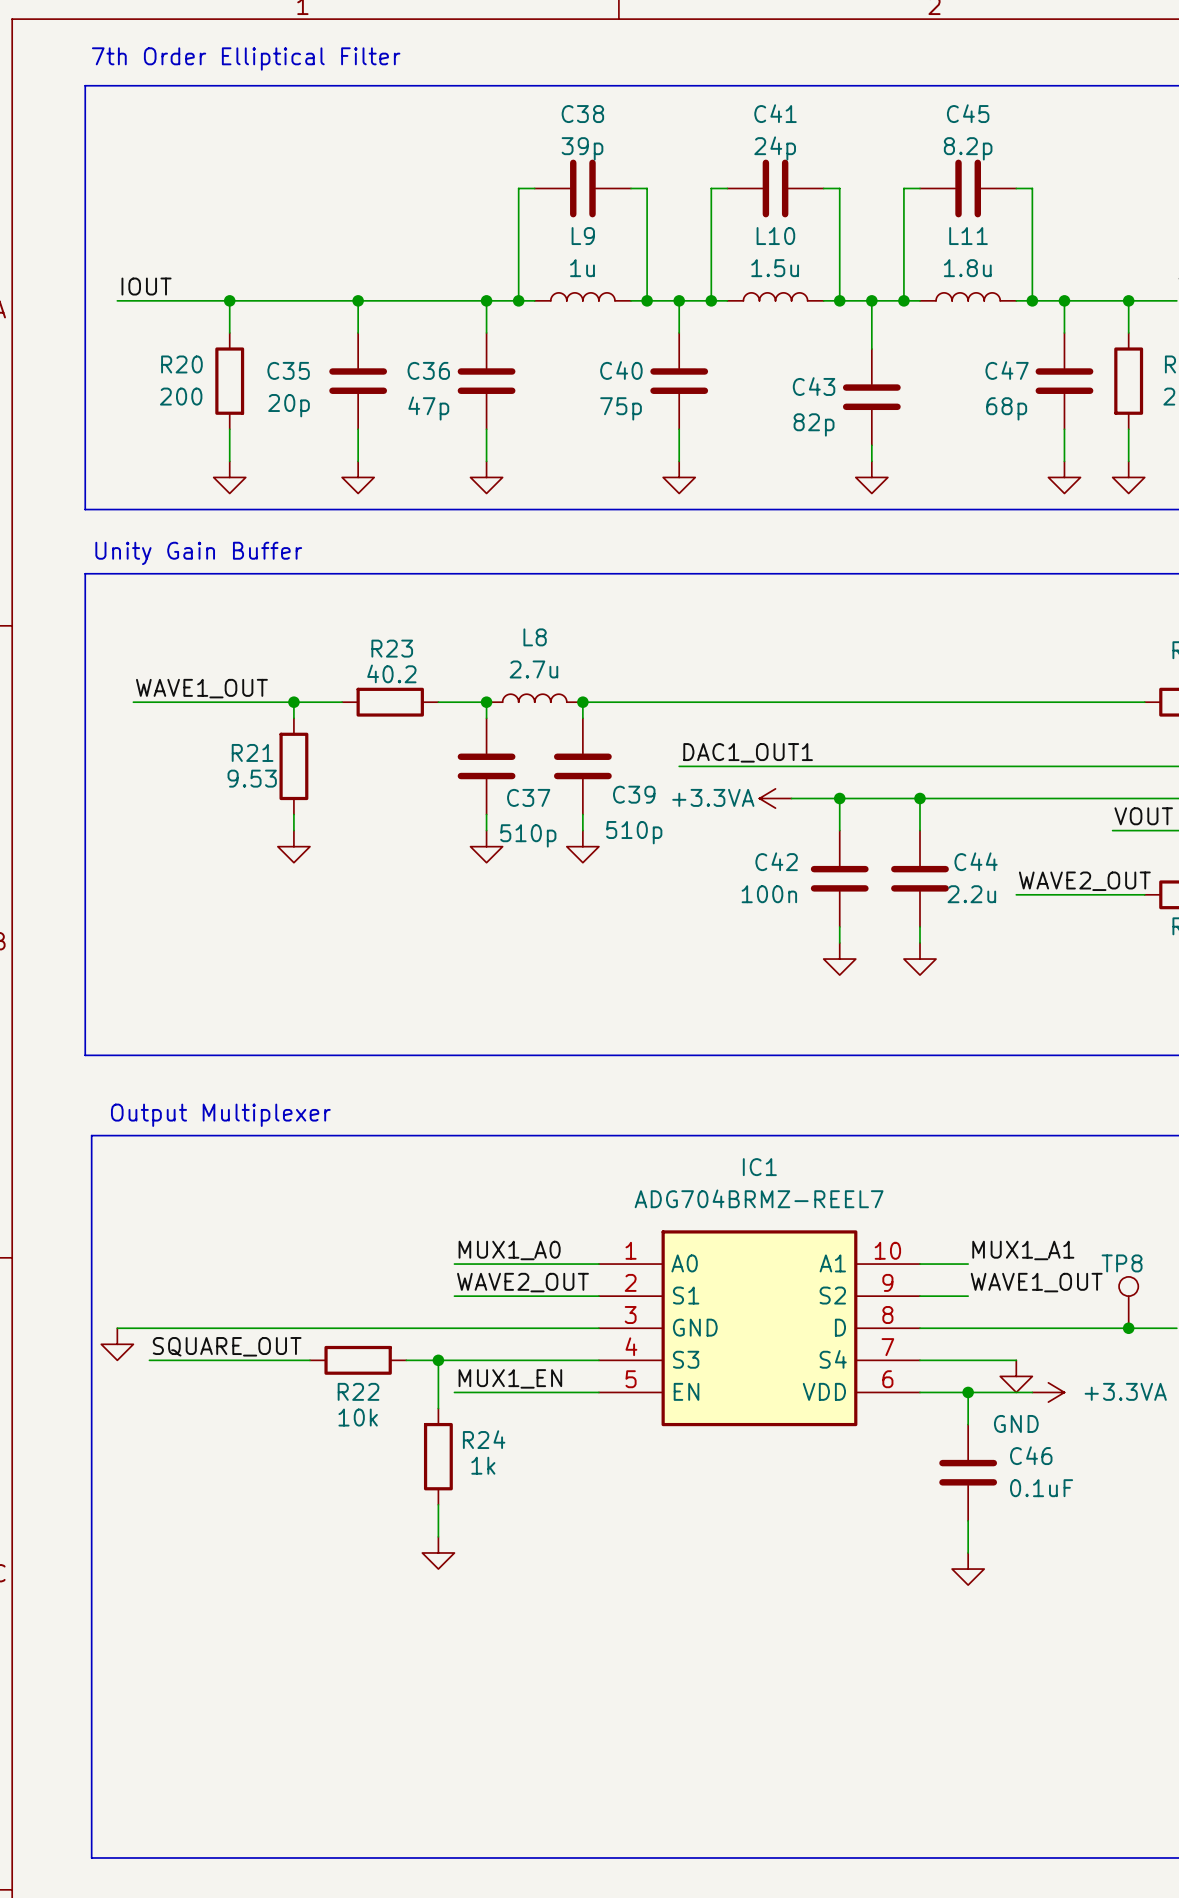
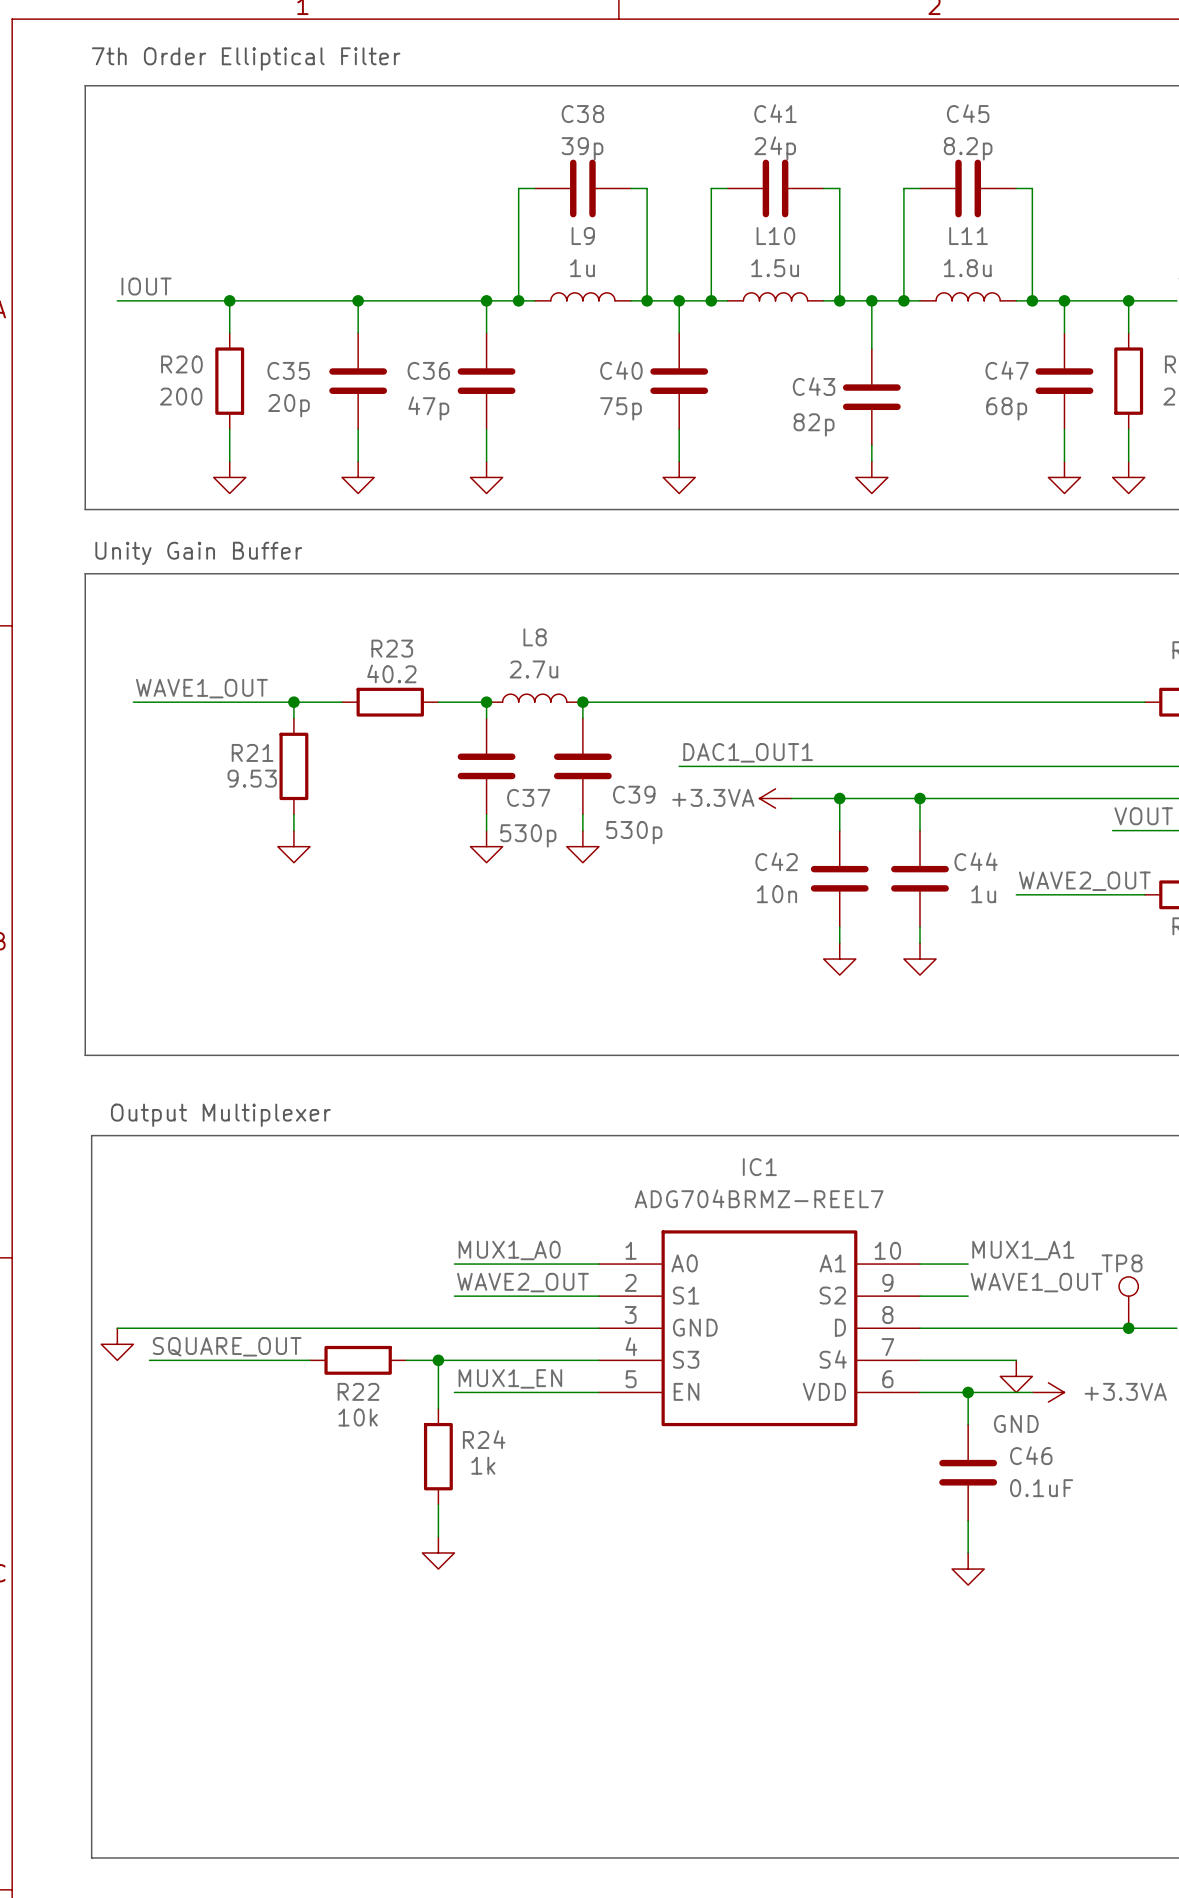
C39 value: 510p (634, 832) -> 530p (634, 832)
C37 value: 510p (528, 835) -> 530p (528, 835)
C42 value: 100n (769, 894) -> 10n (777, 894)
C44 value: 2.2u (971, 894) -> 1u (983, 894)

